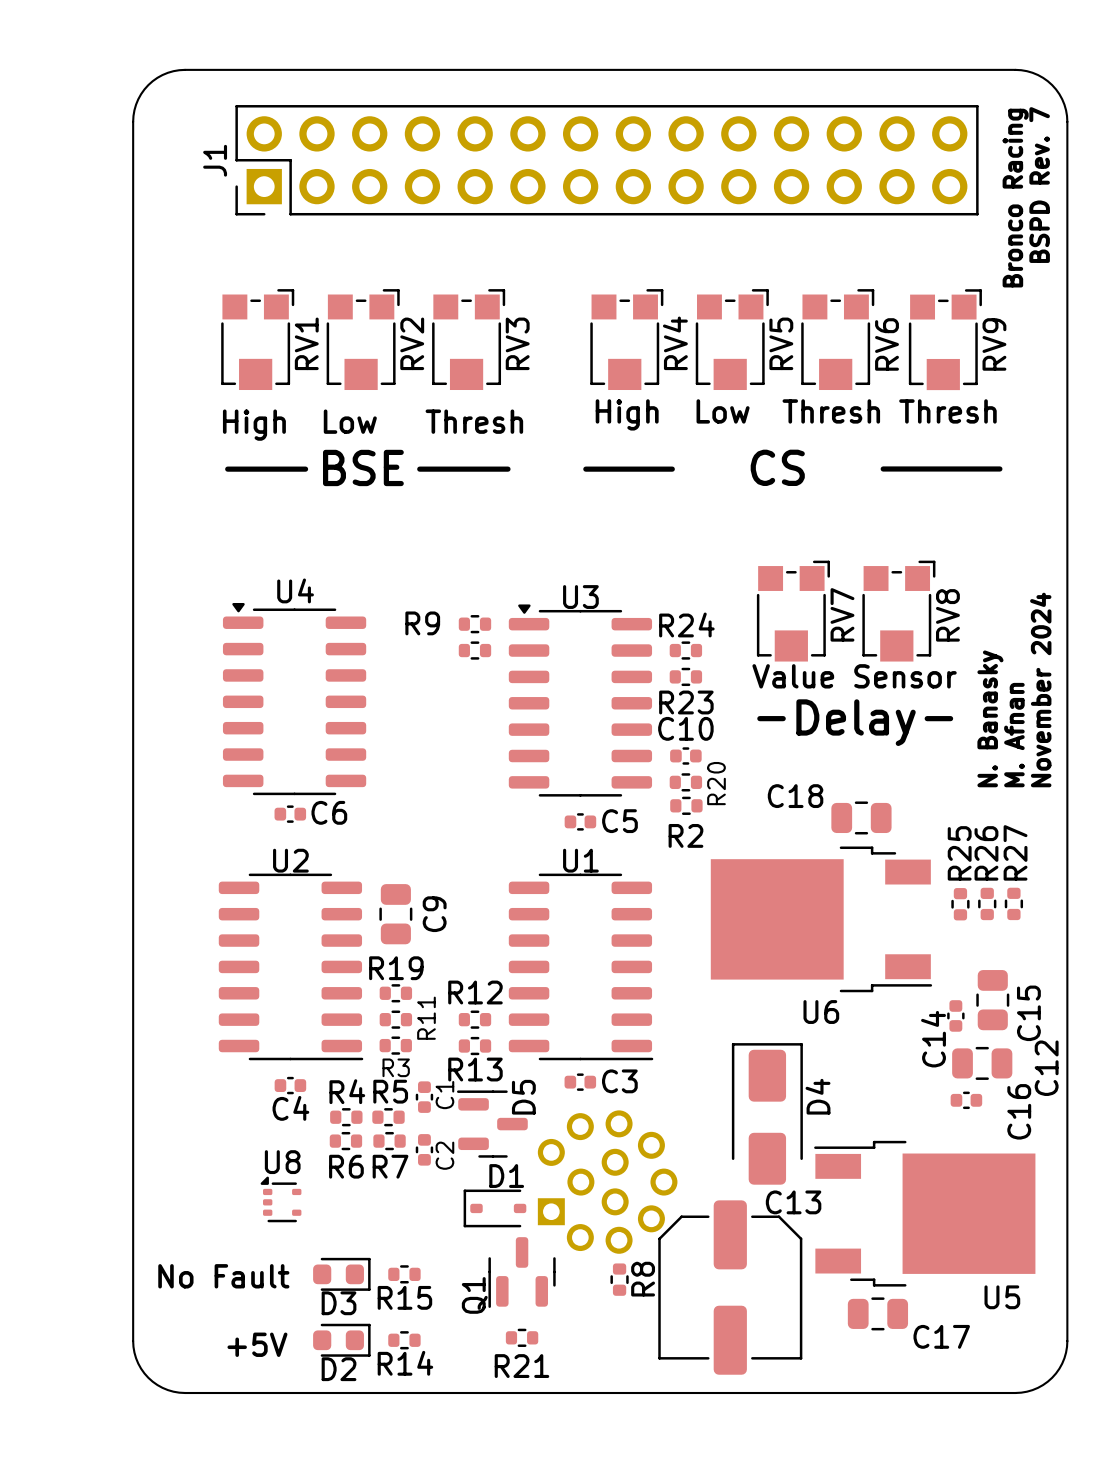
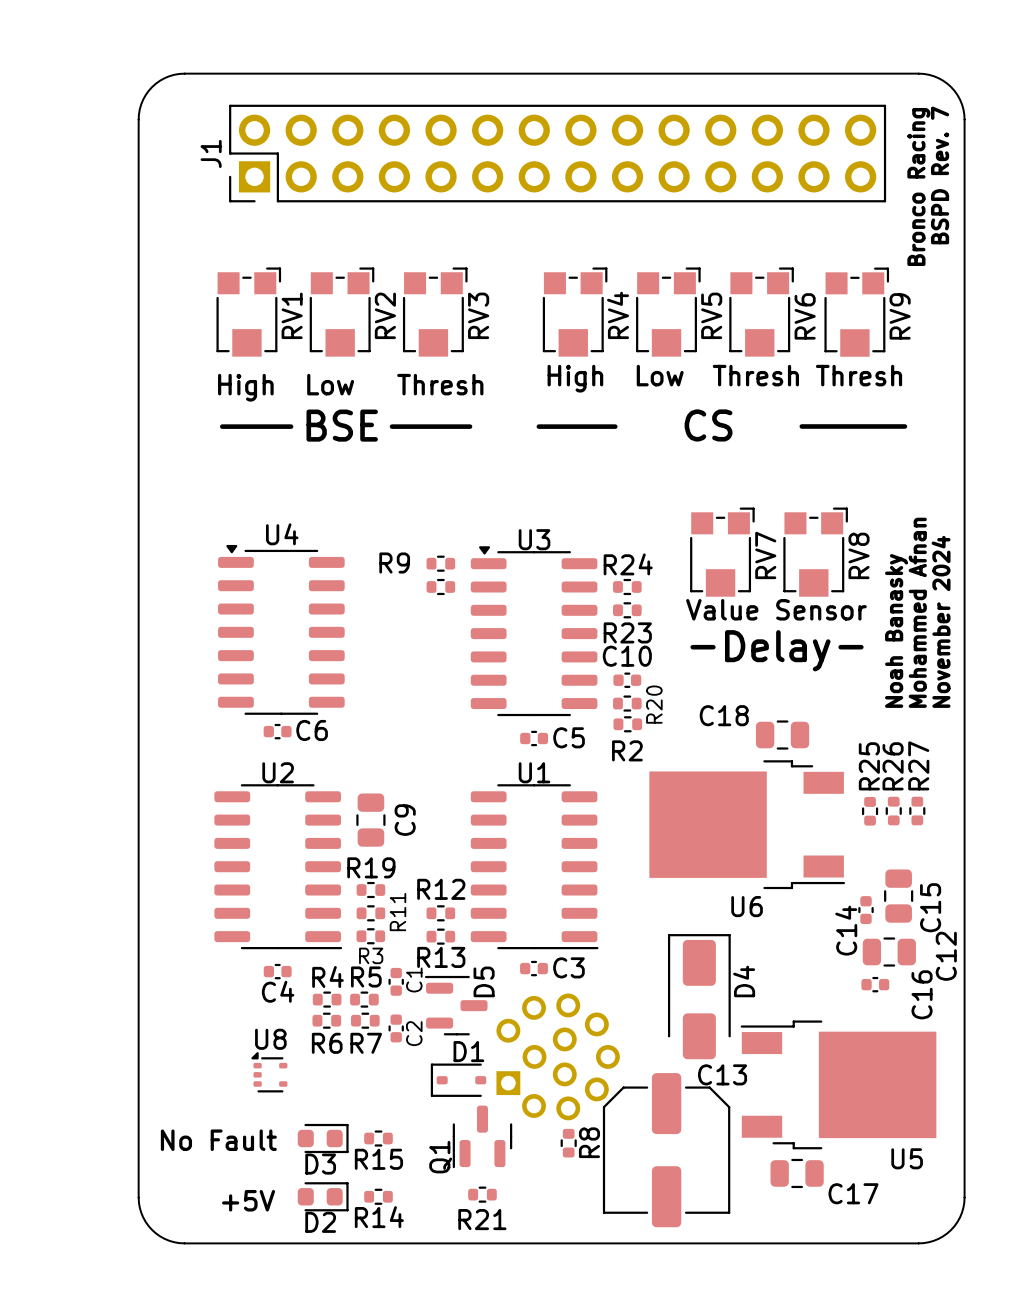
text: N. Banasky (990, 718) -> Noah Banasky (896, 630)
text: M. Afnan (1014, 735) -> Mohammed Afnan (917, 612)

